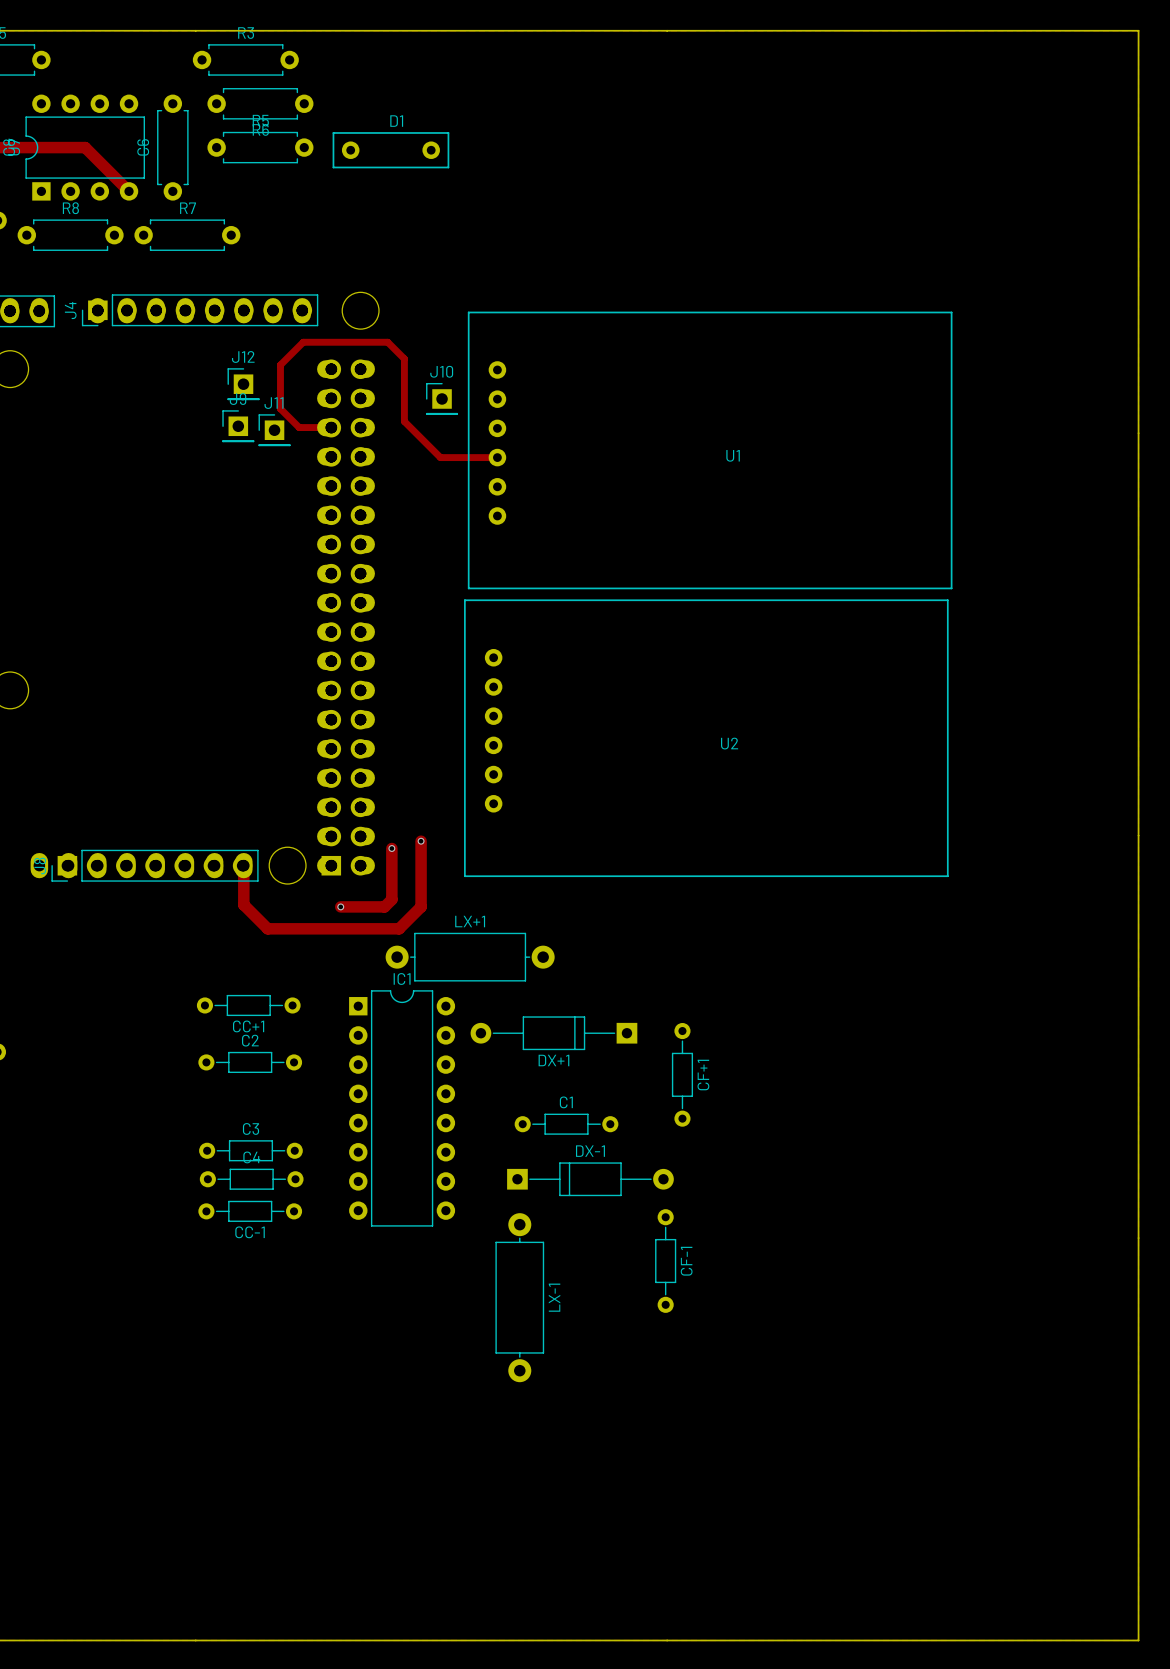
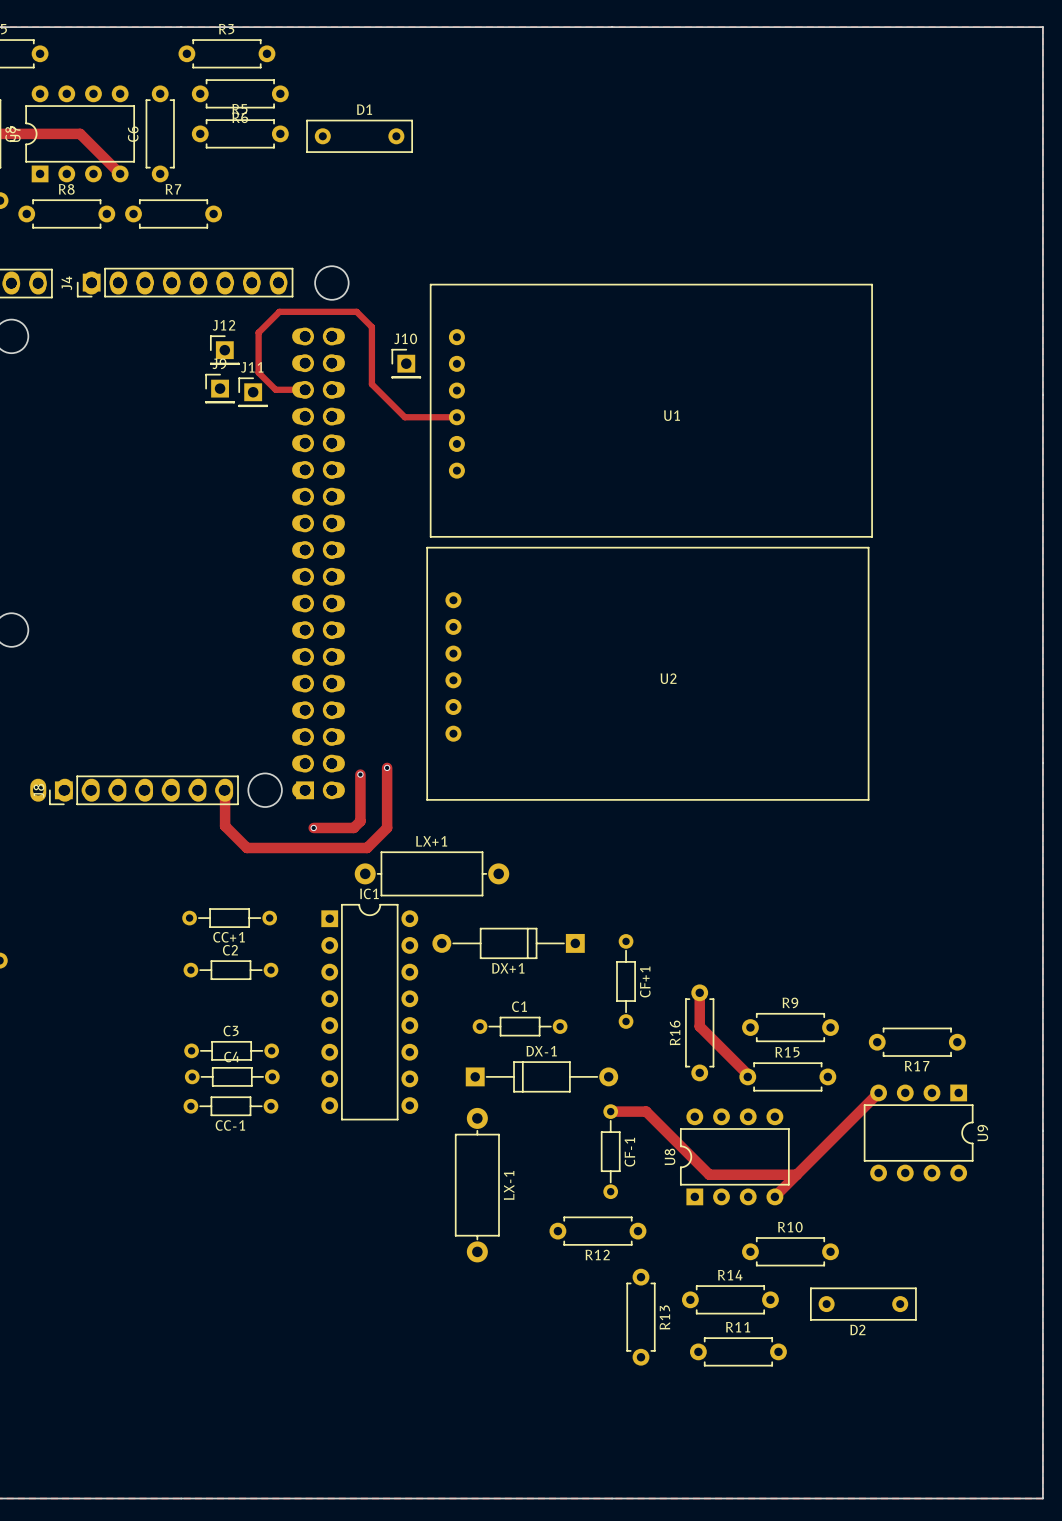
track: none -> (699, 992) (699, 1026) (747, 1074) (747, 1076)
R9: none -> (790, 1027)
R16: none -> (699, 1032)
R17: none -> (917, 1042)
R15: none -> (787, 1076)
track: none -> (878, 1092) (774, 1196)
track: none -> (610, 1111) (646, 1111) (709, 1174) (796, 1174)
U9: none -> (918, 1132)
U8: none -> (734, 1156)
R12: none -> (597, 1231)
R10: none -> (790, 1251)
R14: none -> (730, 1299)
D2: none -> (863, 1304)
R13: none -> (641, 1317)
R11: none -> (738, 1351)

